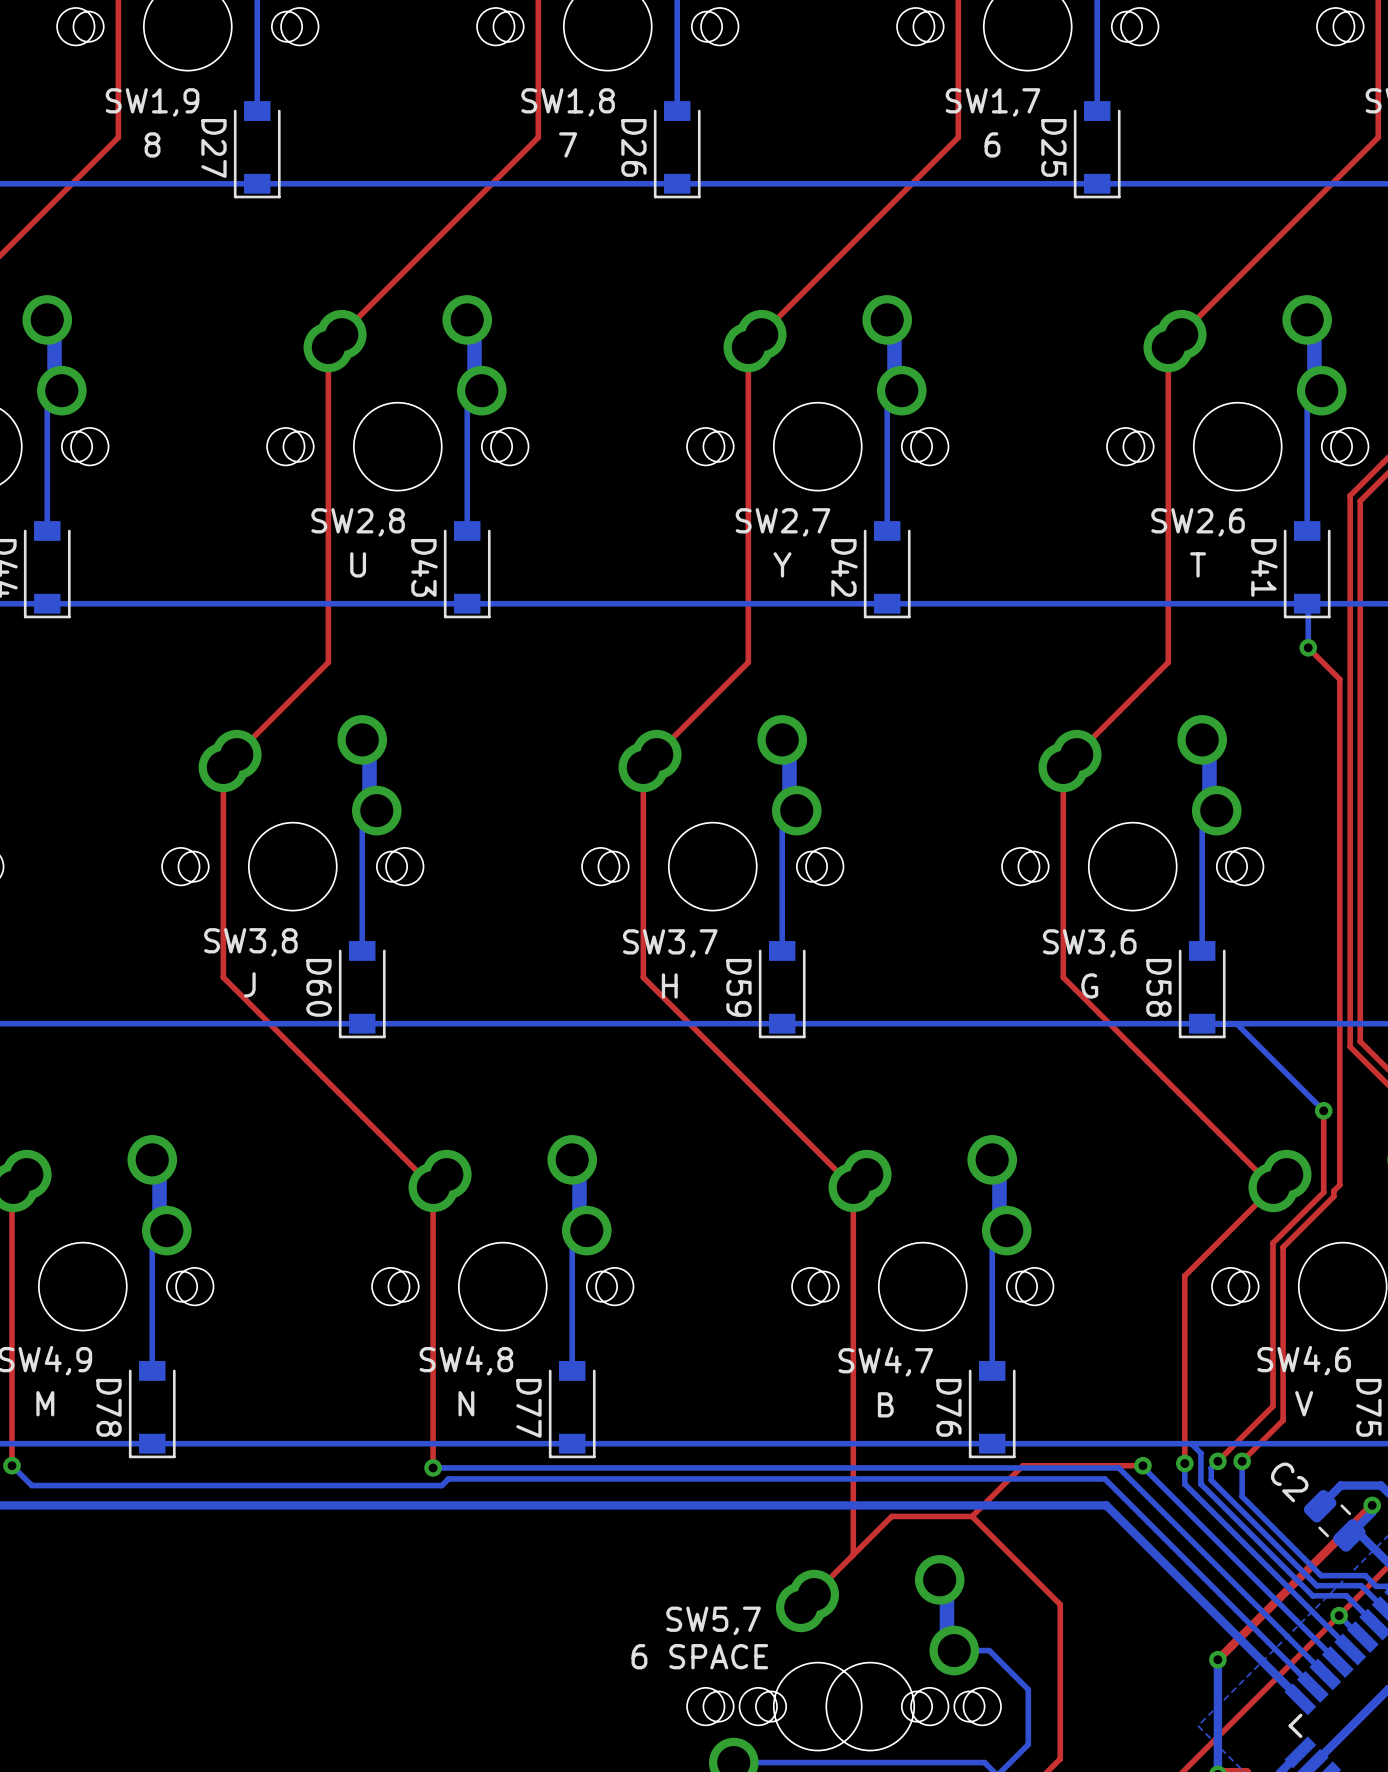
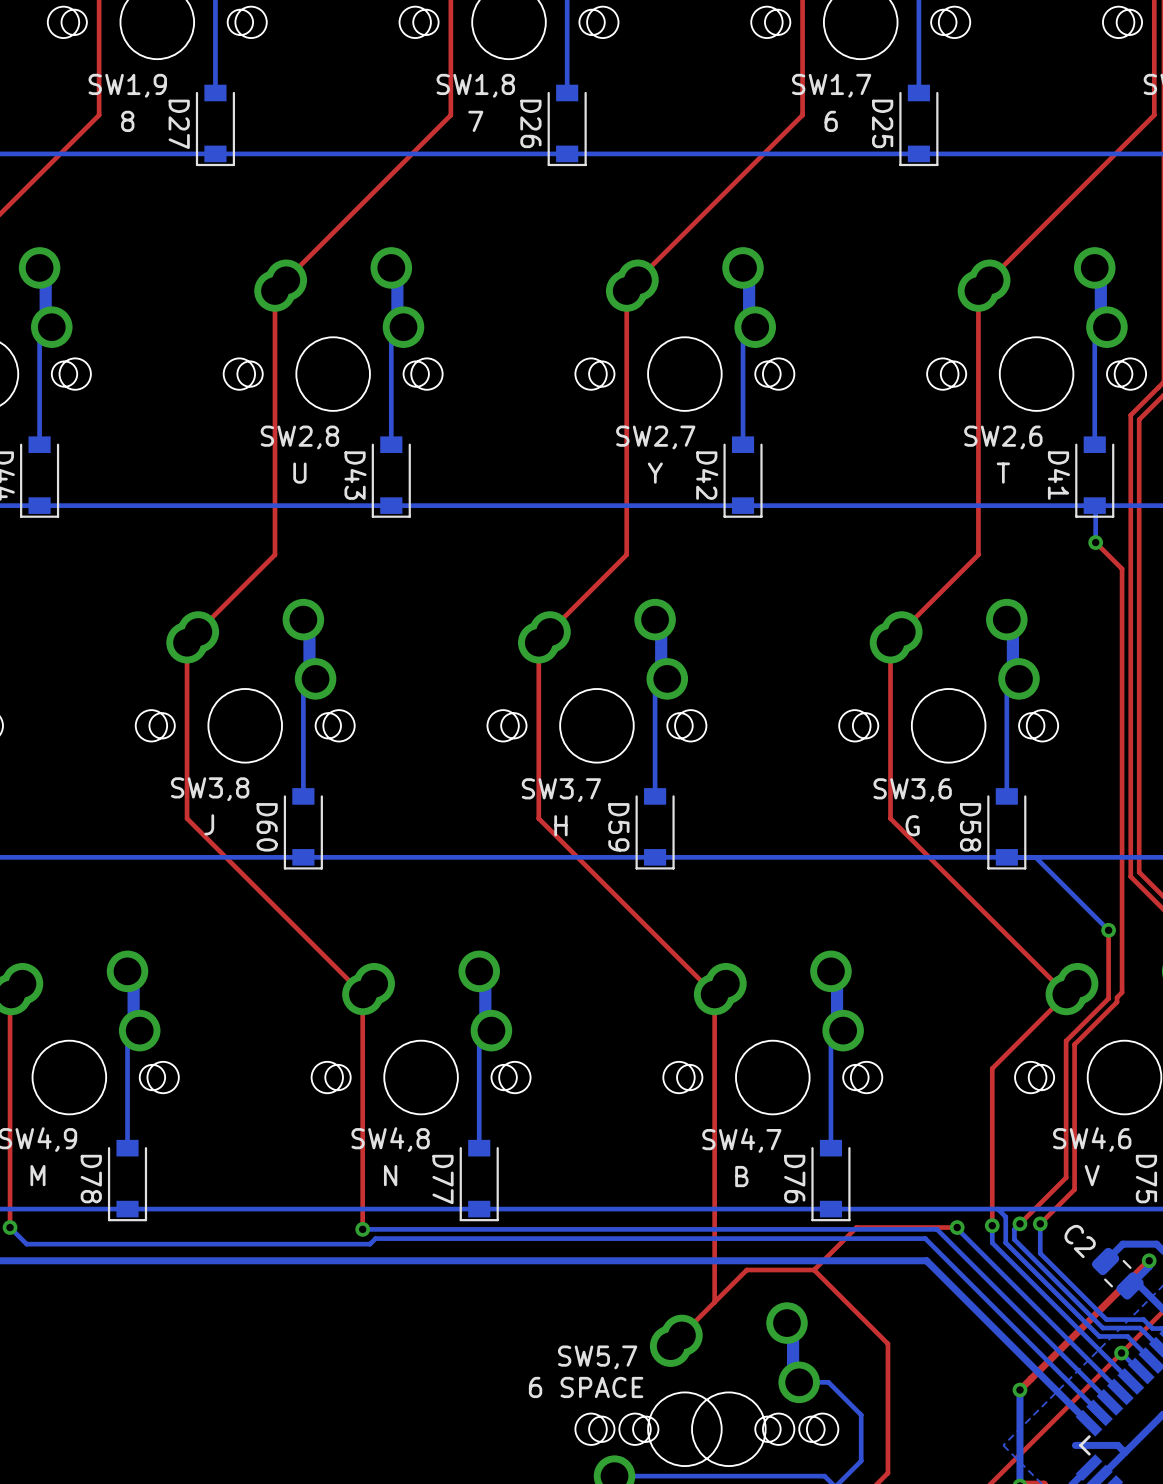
bottom track: none -> (1075, 1445) (1117, 1445) (1124, 1452)

